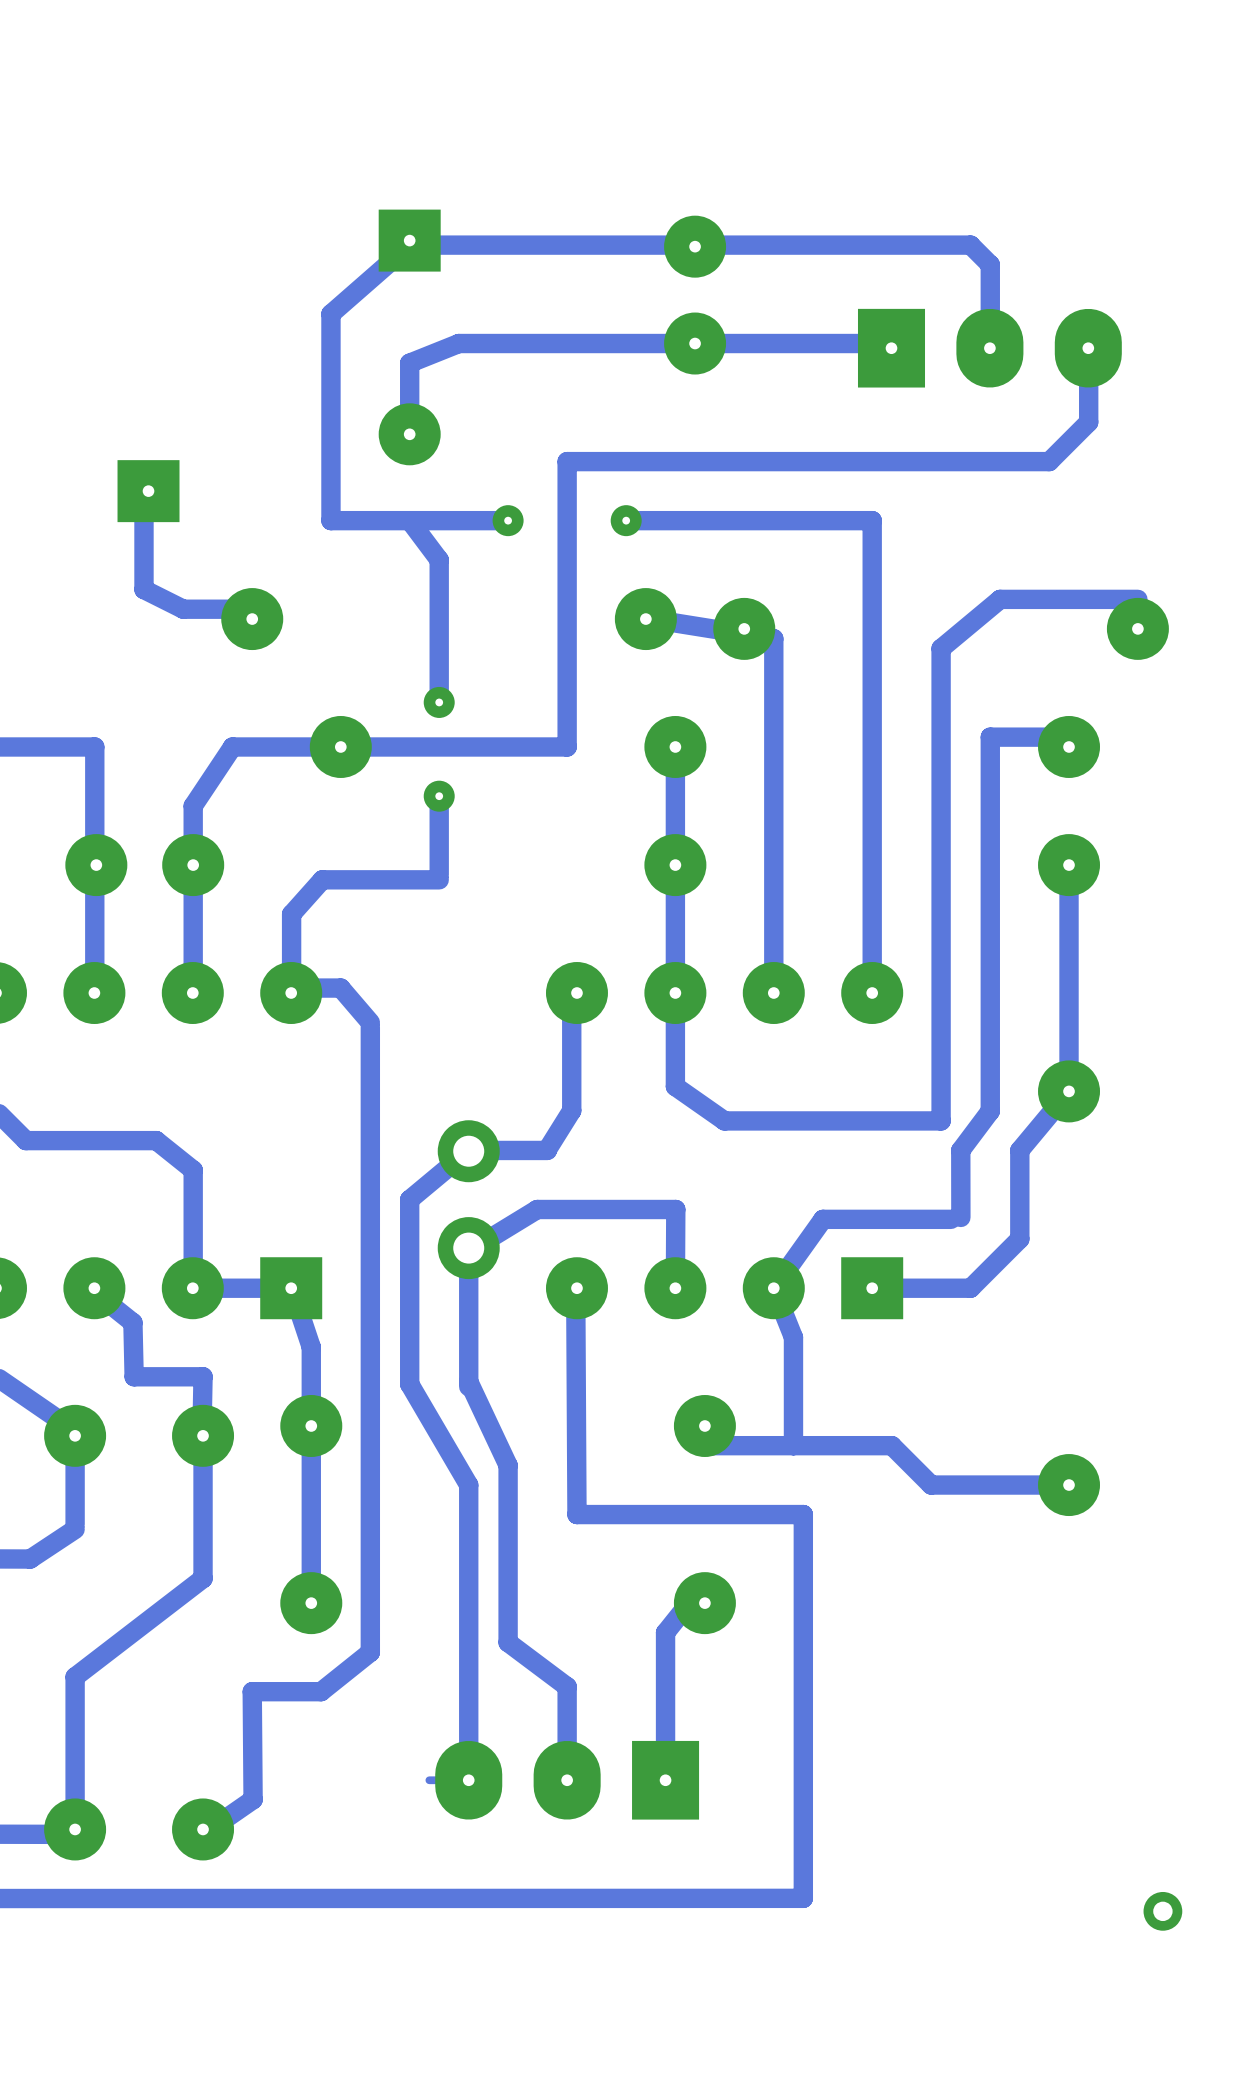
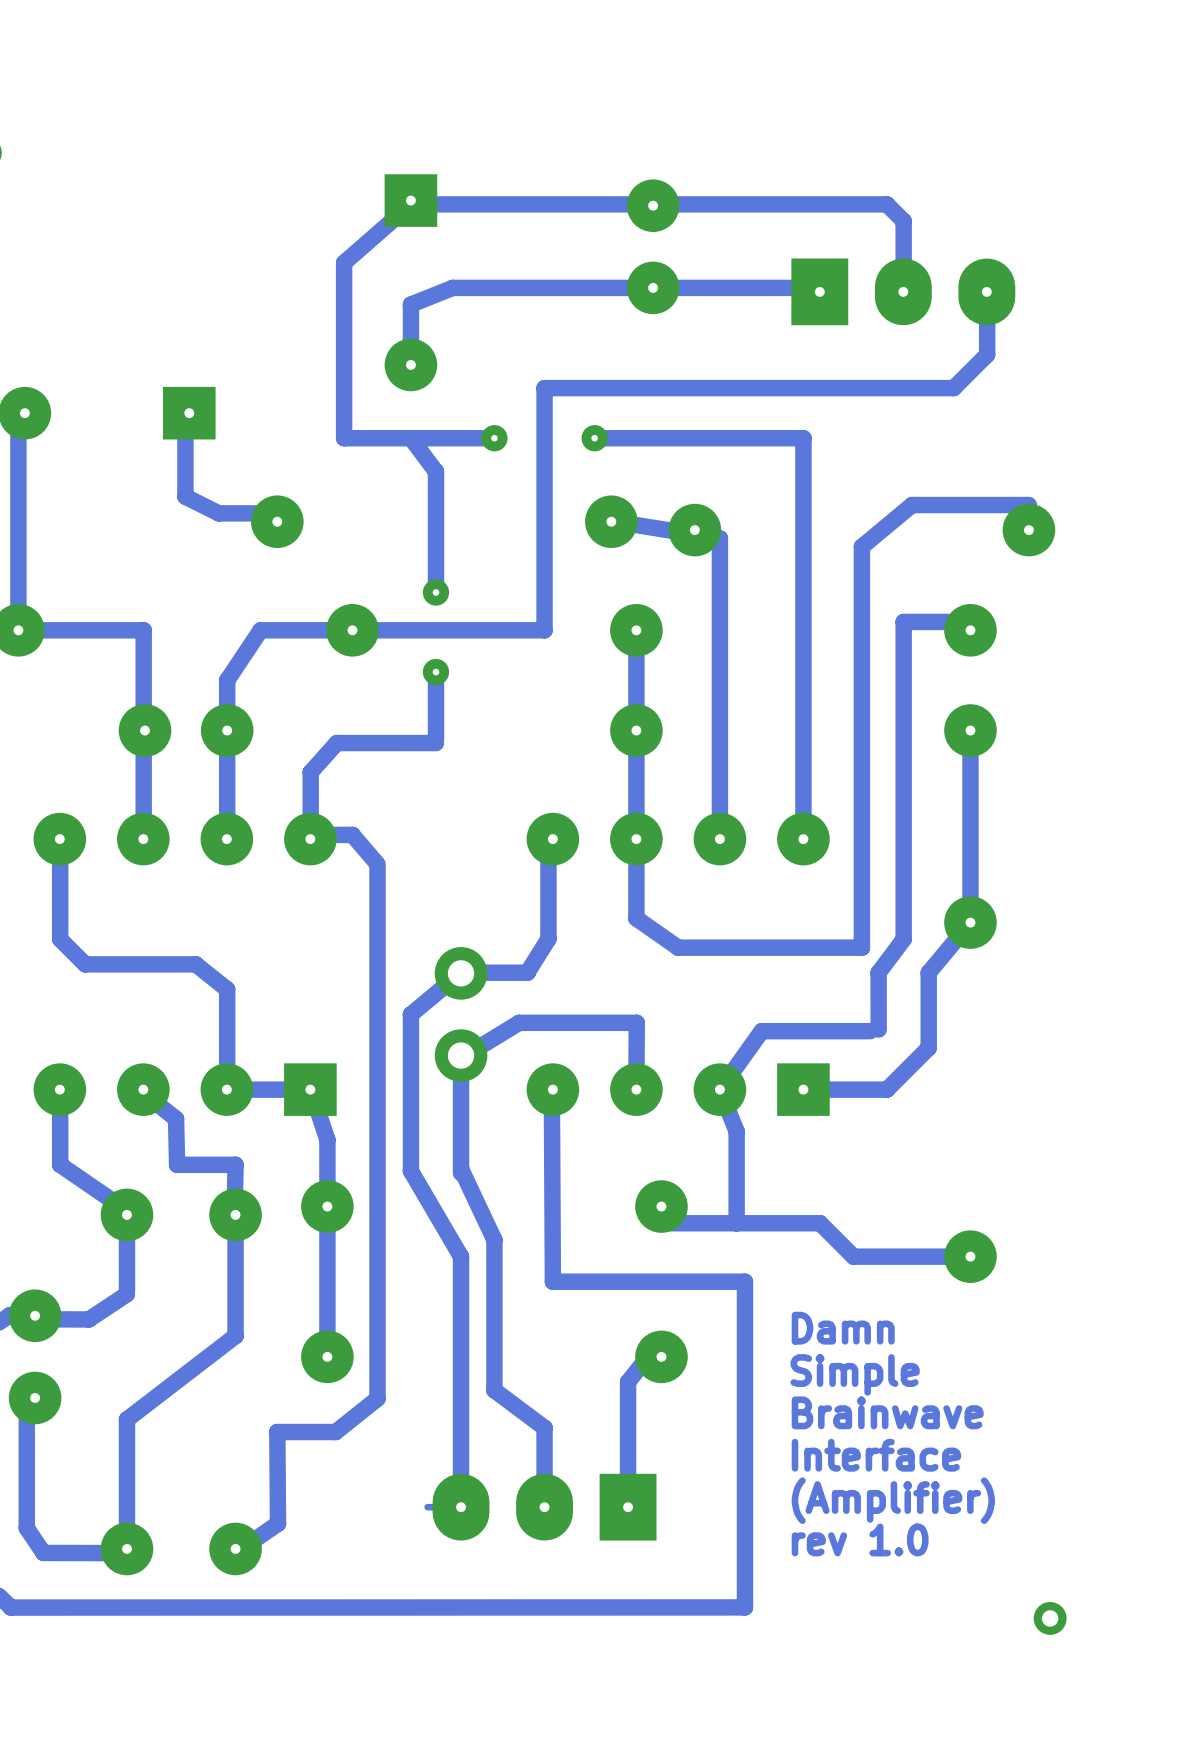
text: none -> Damn (843, 1328)
text: none -> Simple (855, 1374)
text: none -> Brainwave (887, 1412)
text: none -> Interface (876, 1455)
text: none -> (Amplifier) (893, 1500)
text: none -> rev 1.0 (860, 1539)

